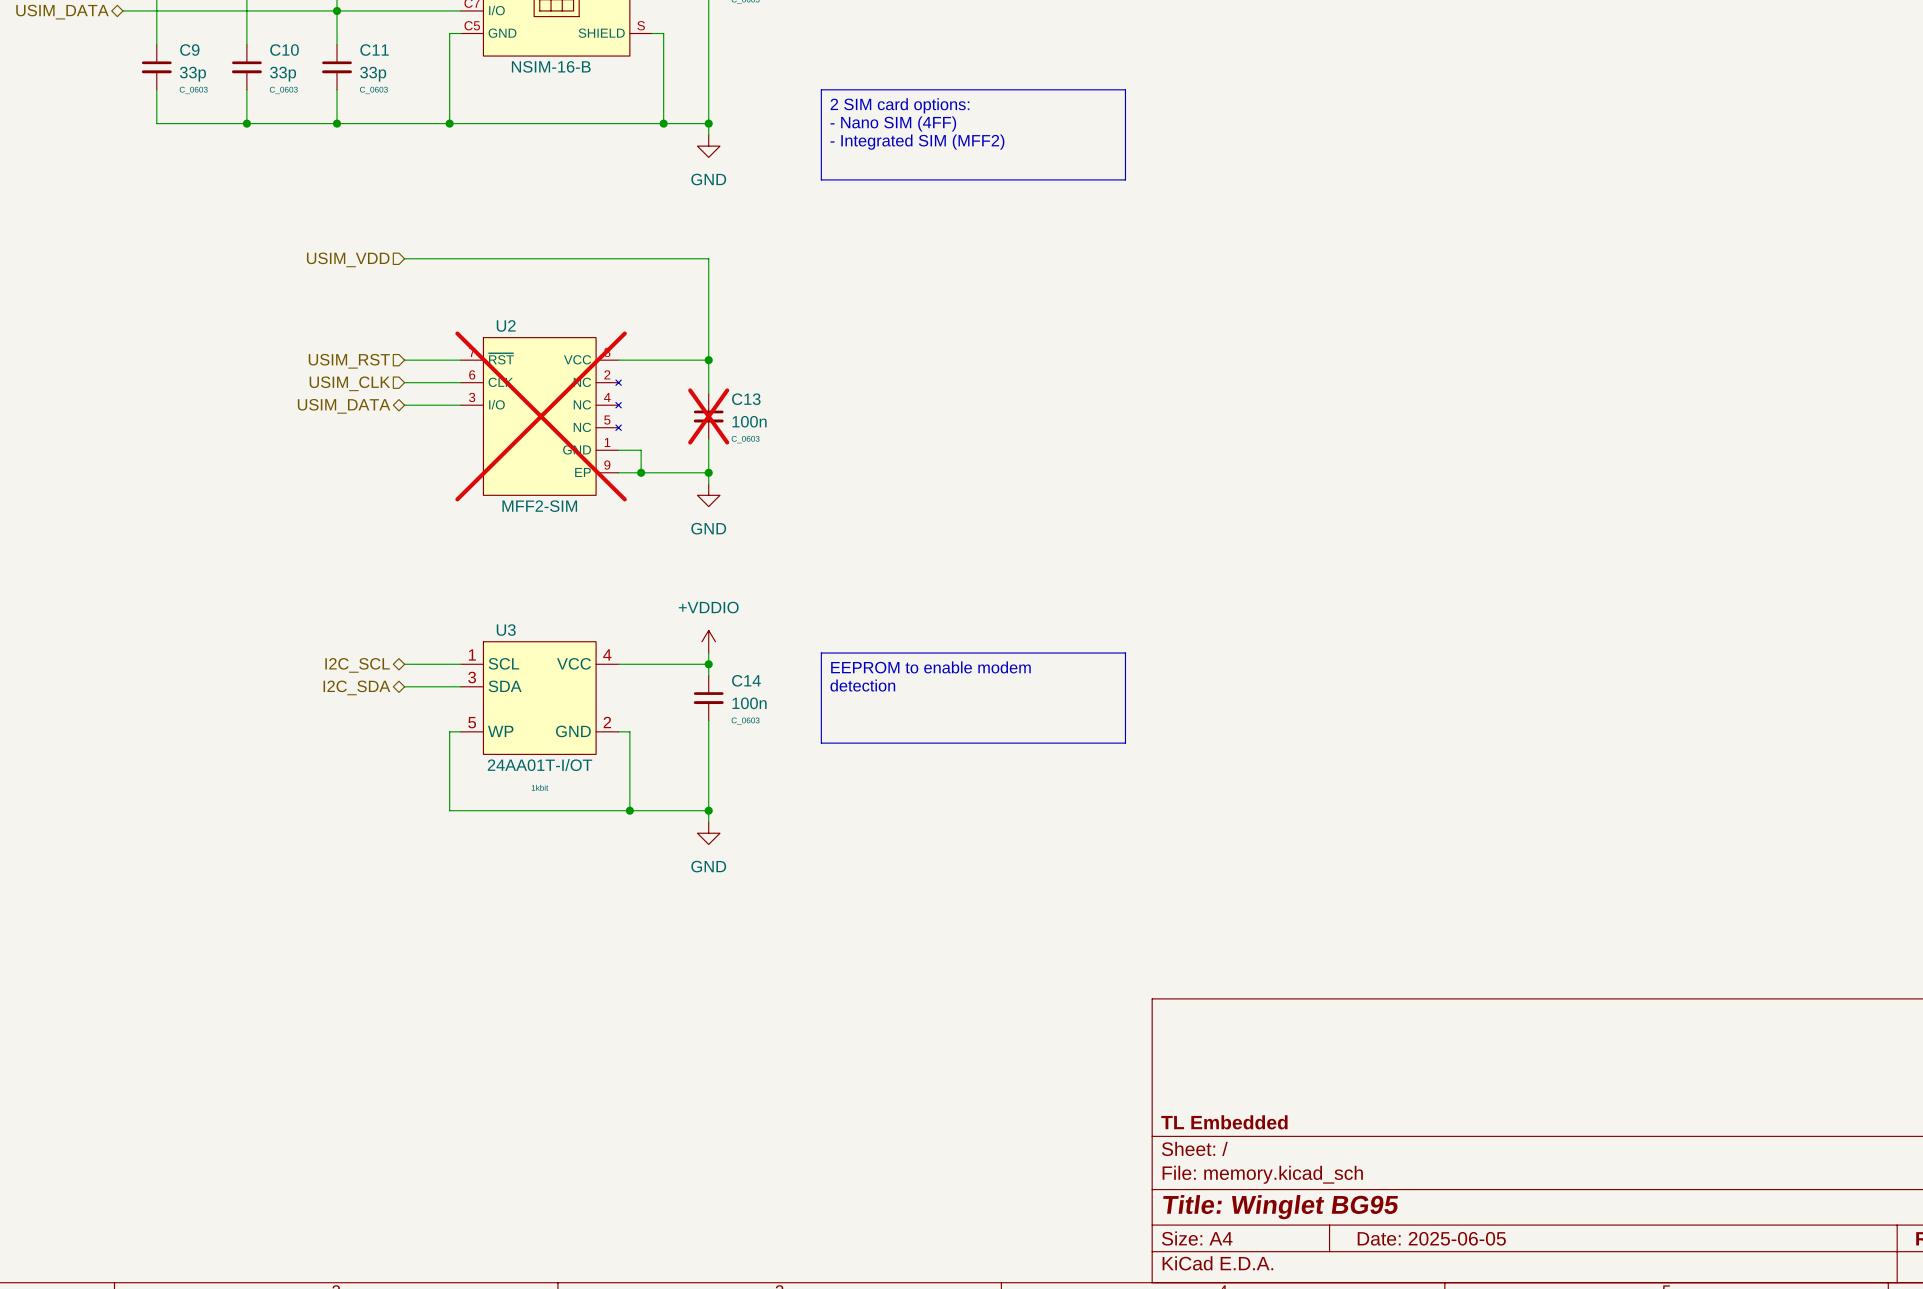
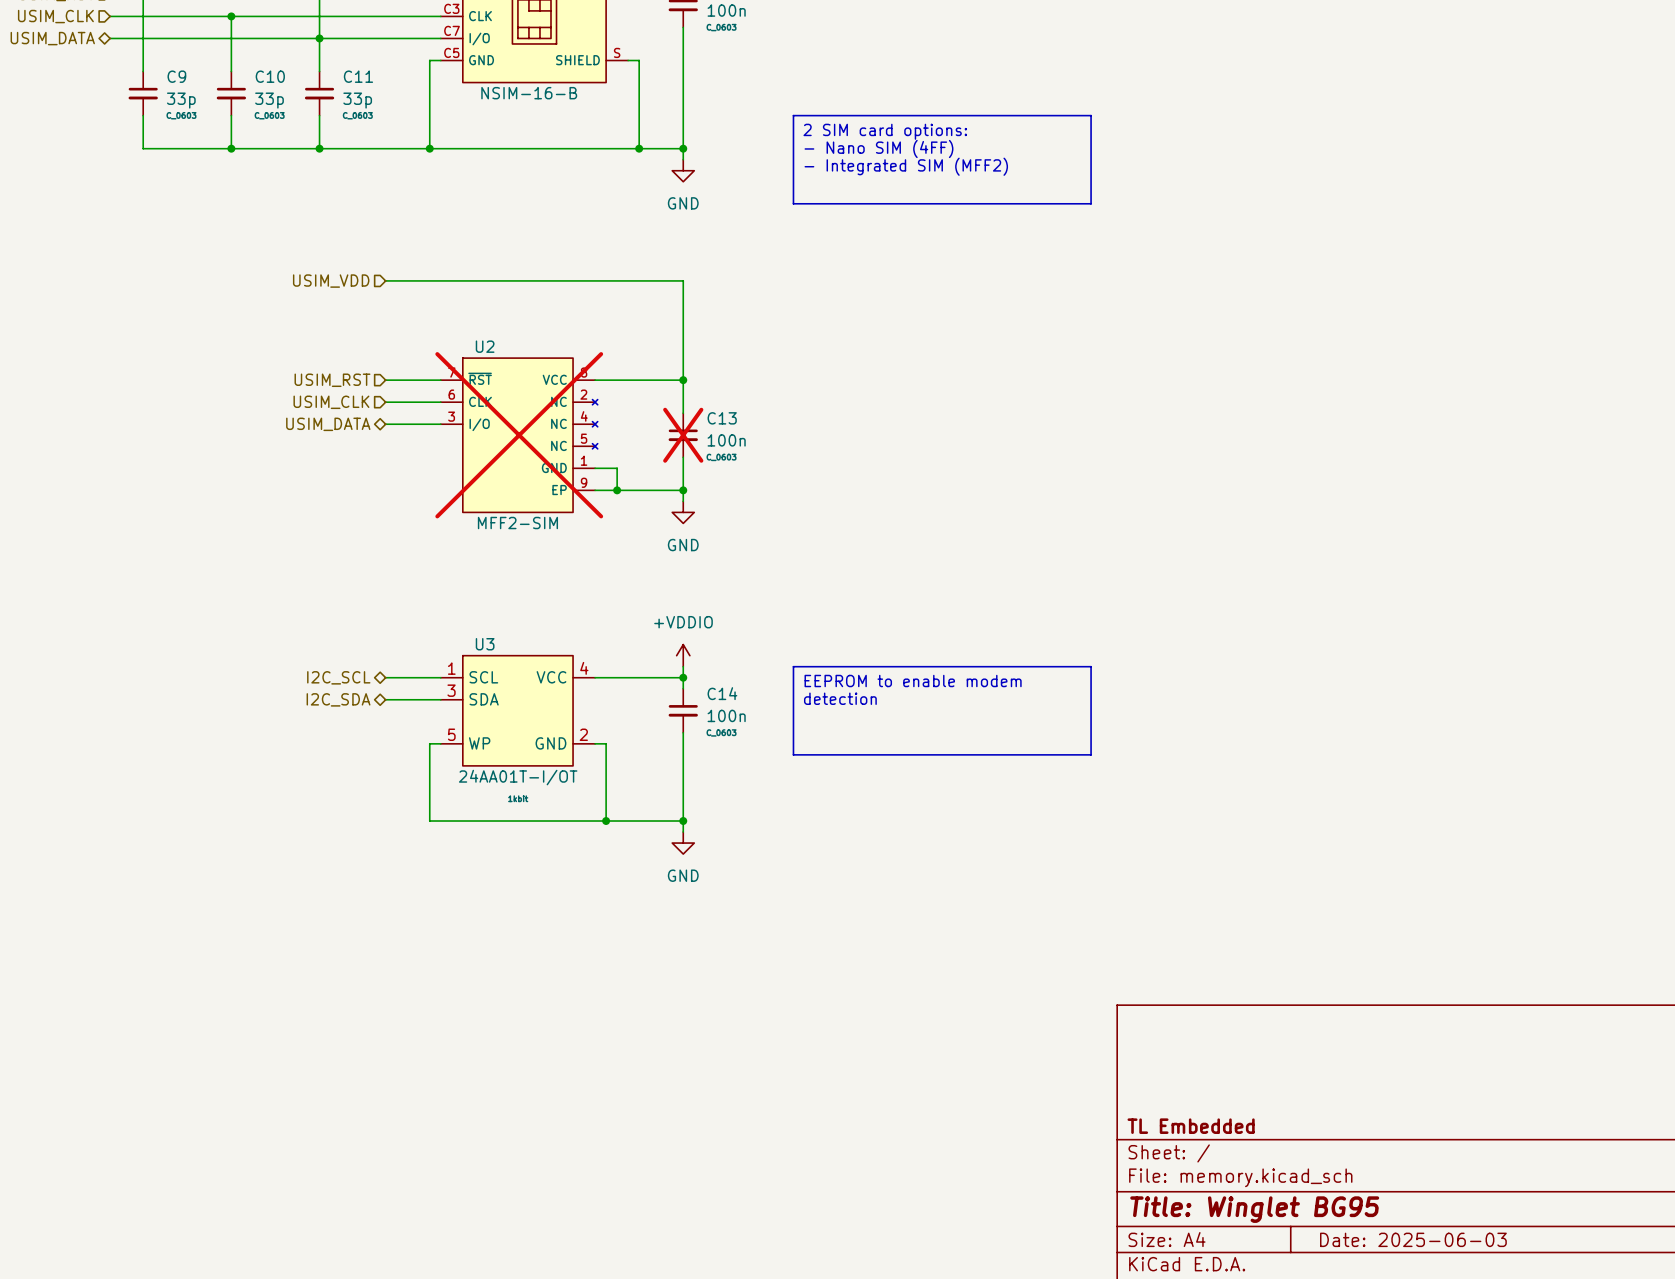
title block: Date: 2025-06-05 (1431, 1238) -> Date: 2025-06-03 (1413, 1239)

